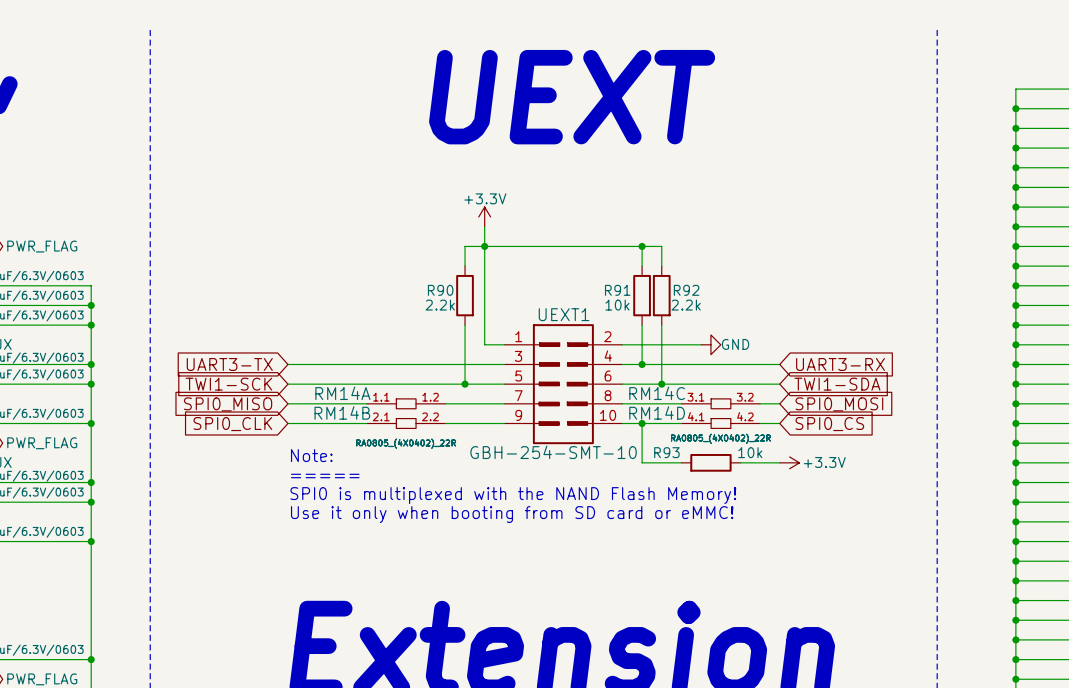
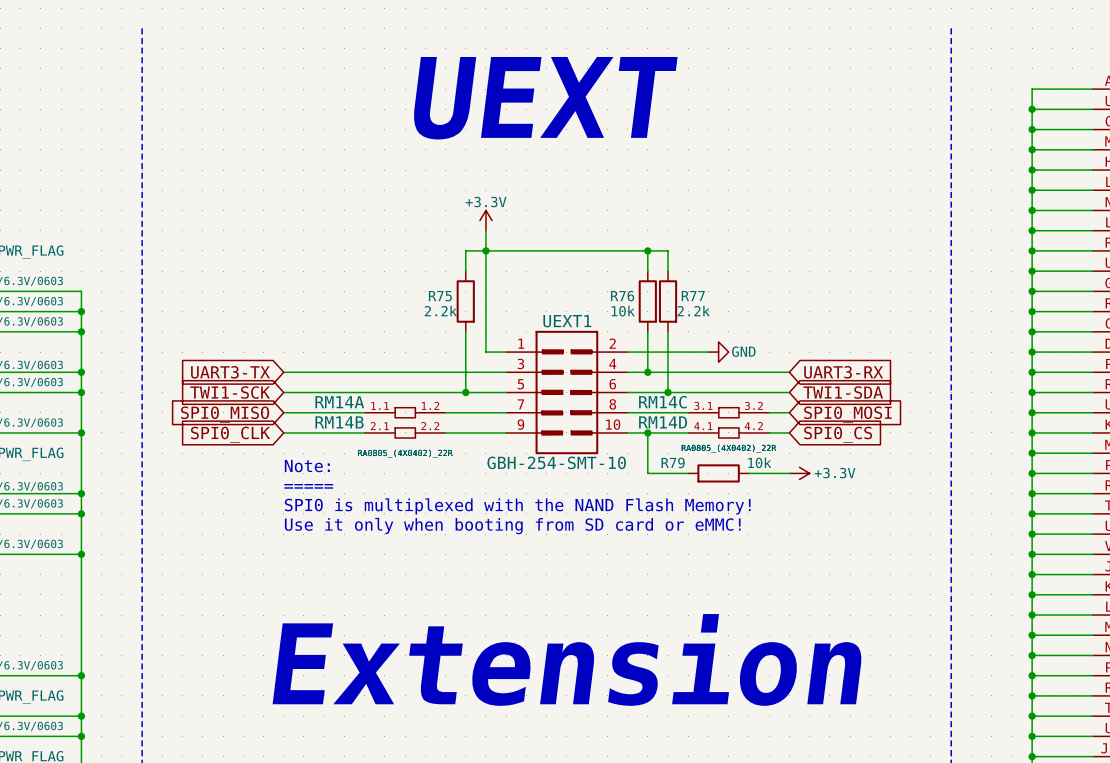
R90 name: R90 (440, 290) -> R75 (440, 296)
R91 name: R91 (617, 290) -> R76 (622, 296)
R92 name: R92 (686, 290) -> R77 (693, 296)
R93 name: R93 (666, 452) -> R79 (673, 462)

